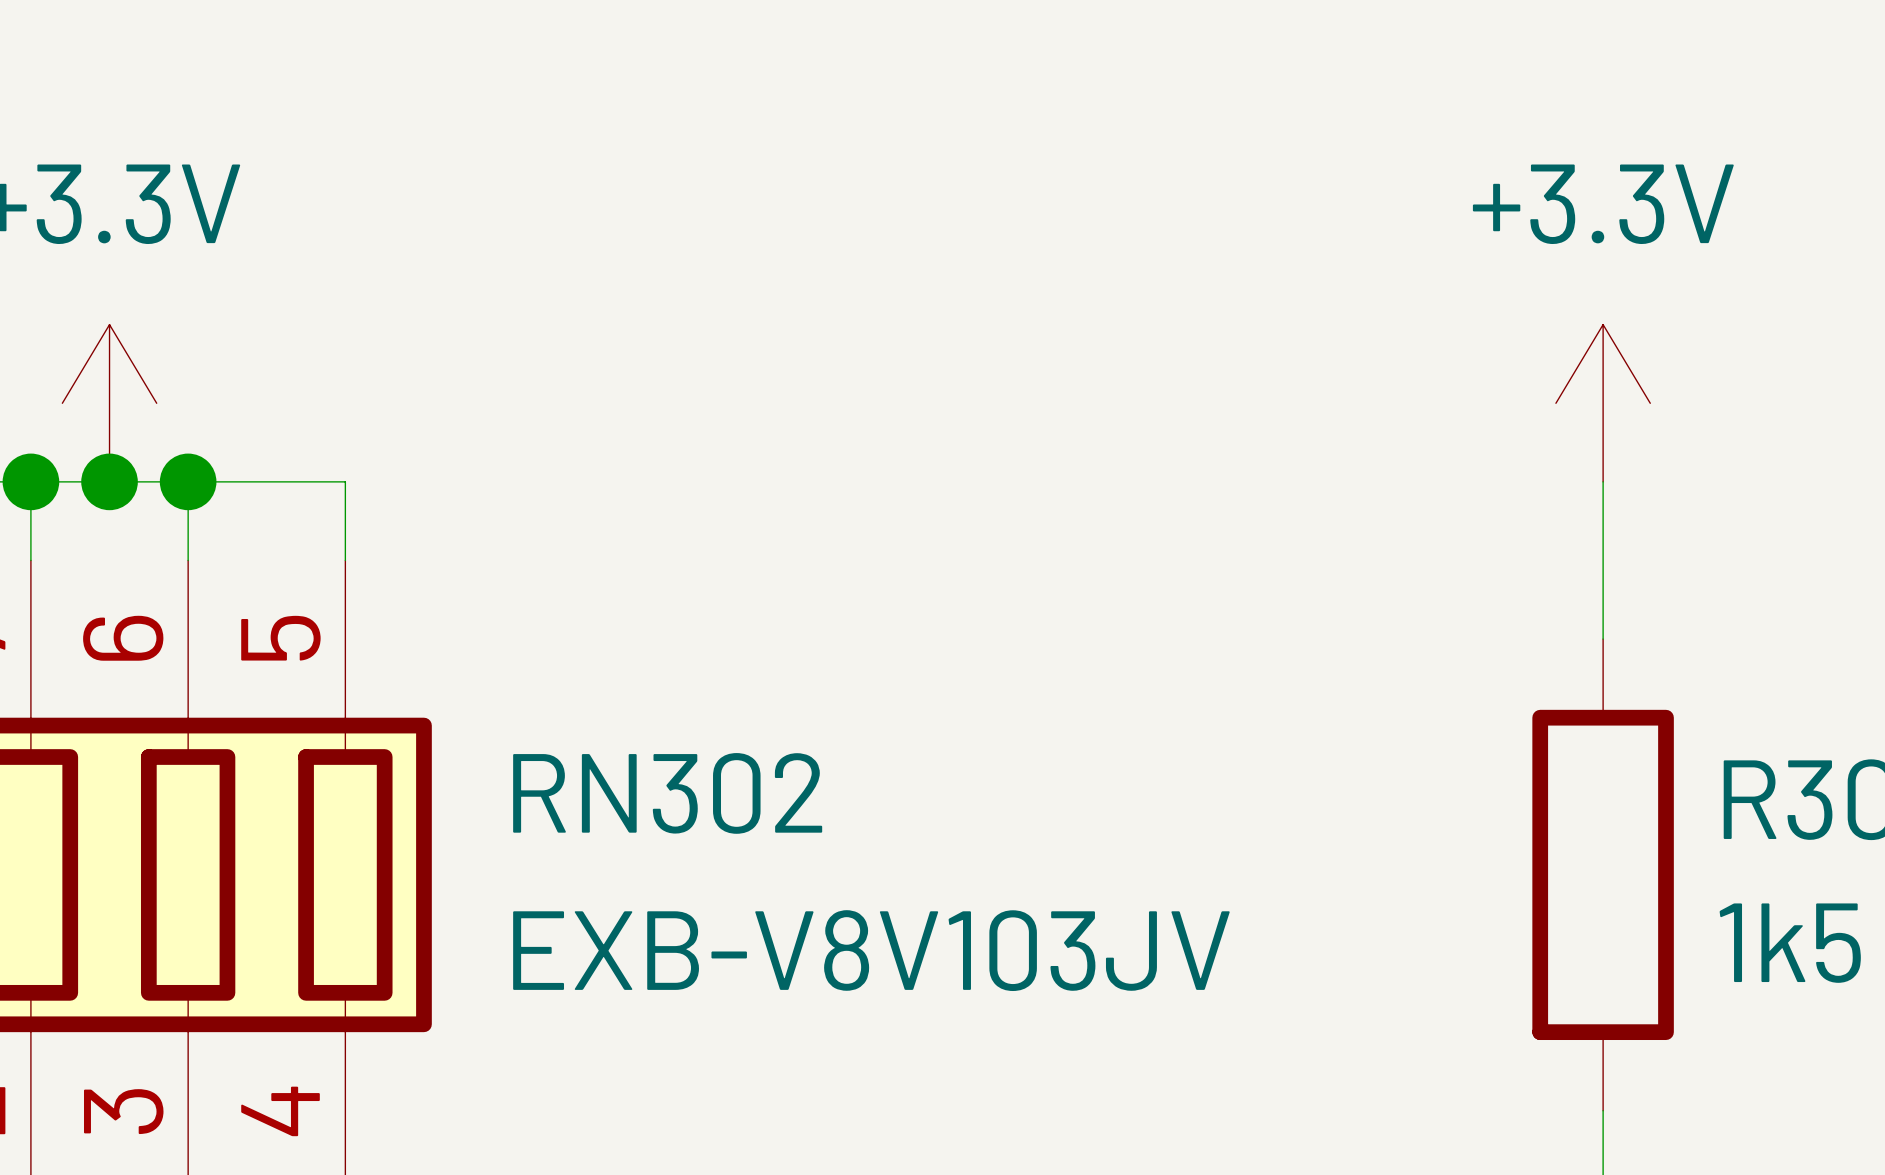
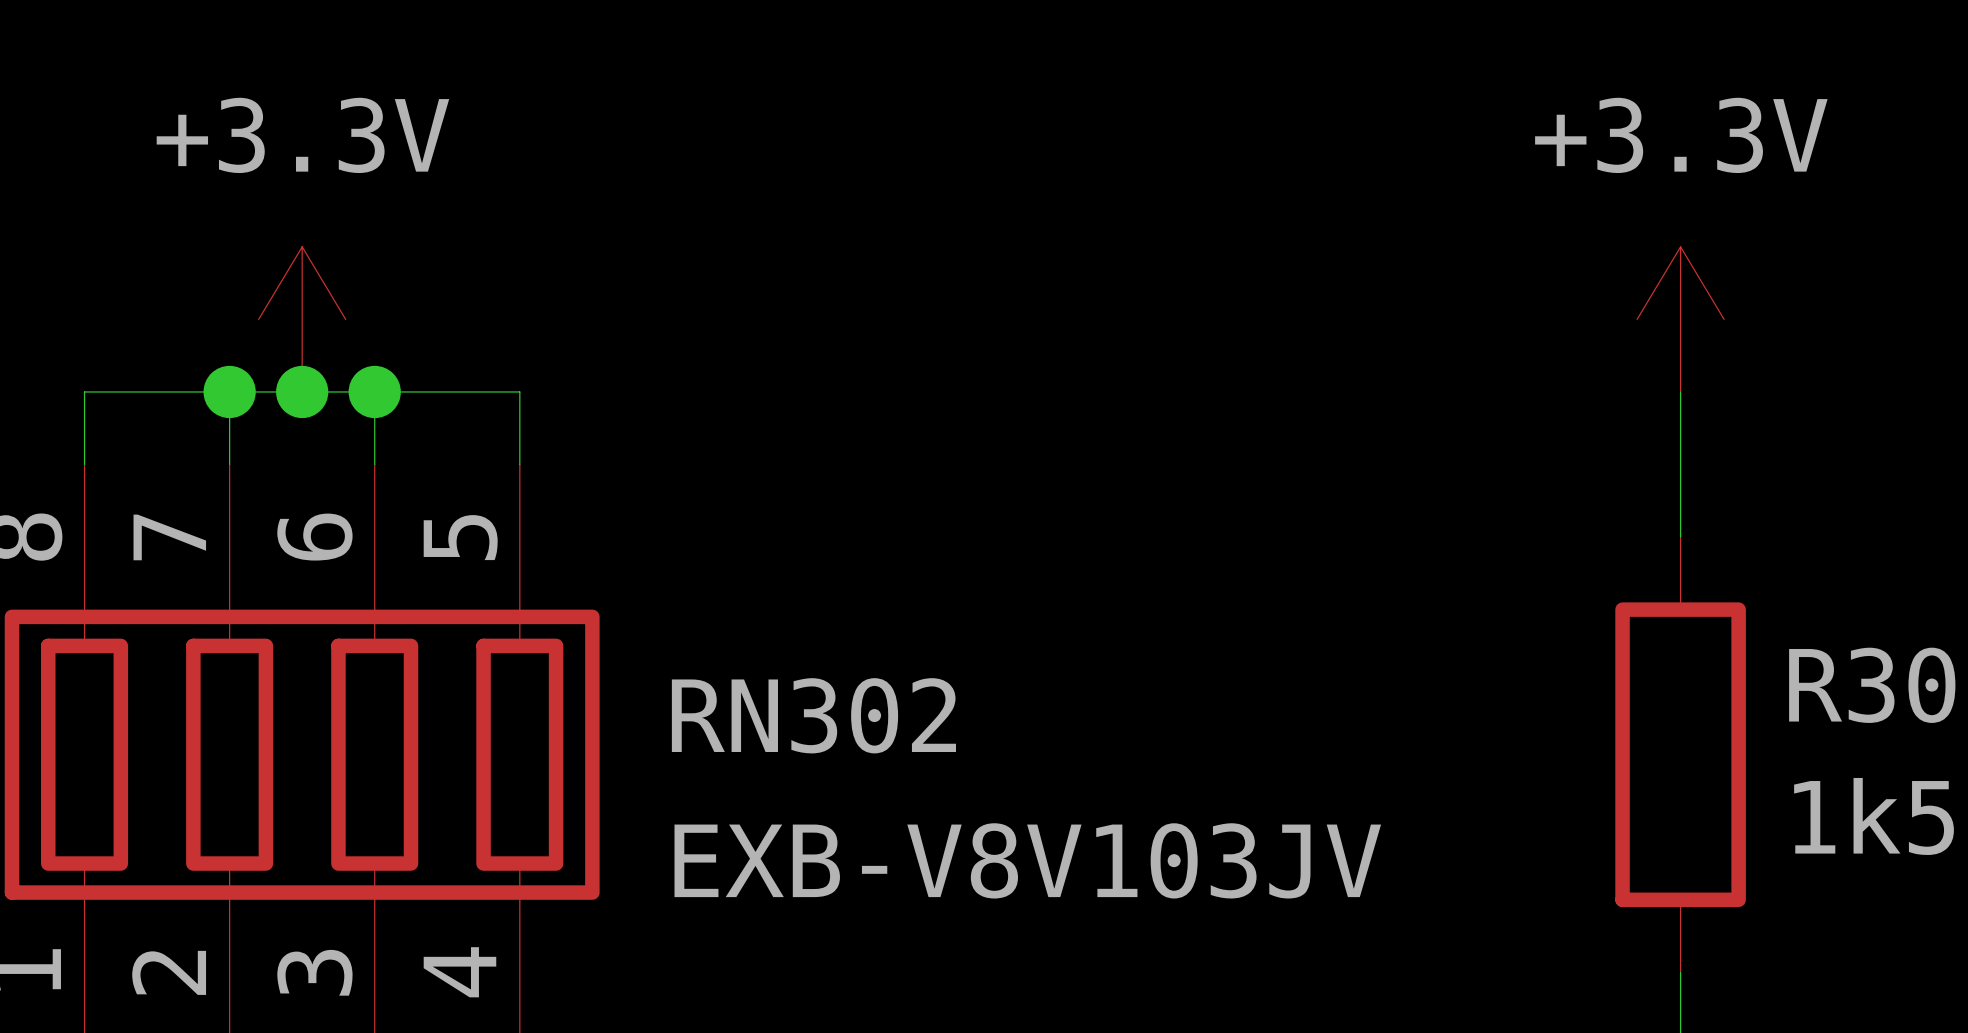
RN302 name position: RN302 (667, 793) -> RN302 (813, 715)
RN302 value position: EXB-V8V103JV (871, 950) -> EXB-V8V103JV (1027, 860)

